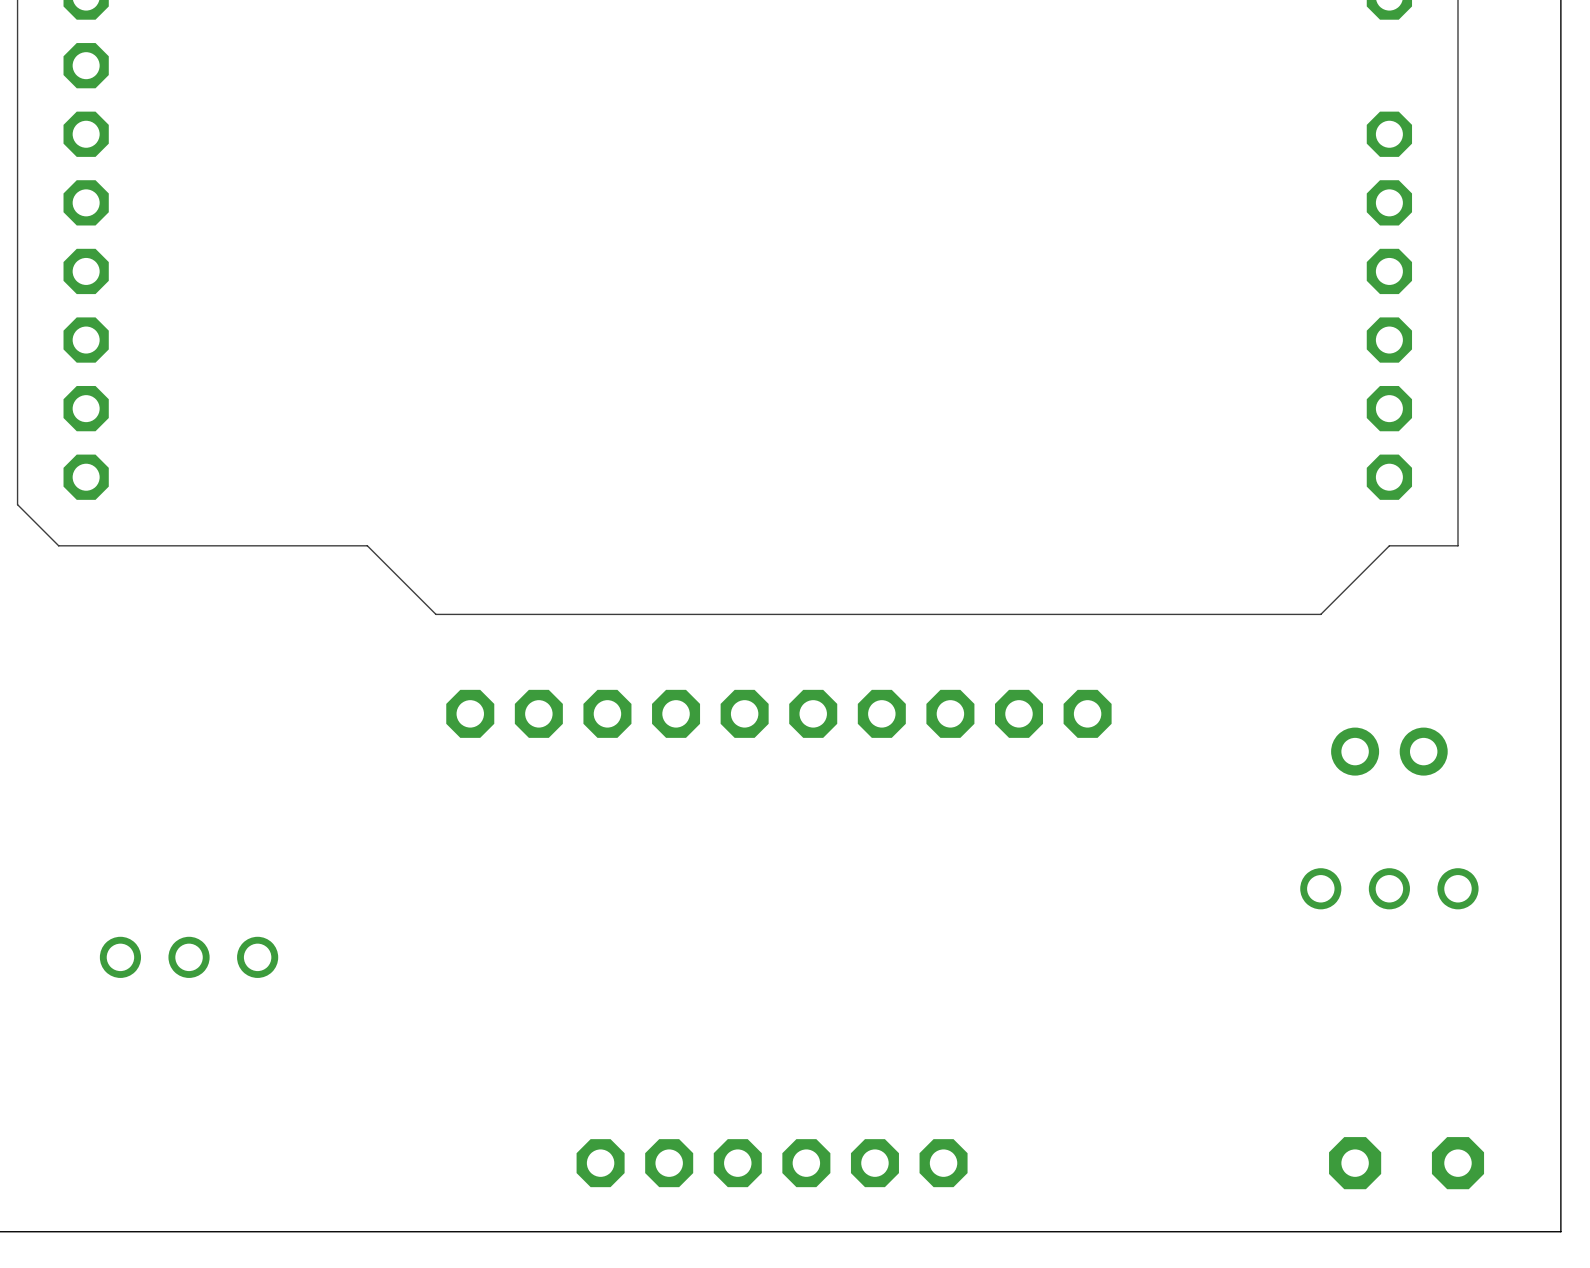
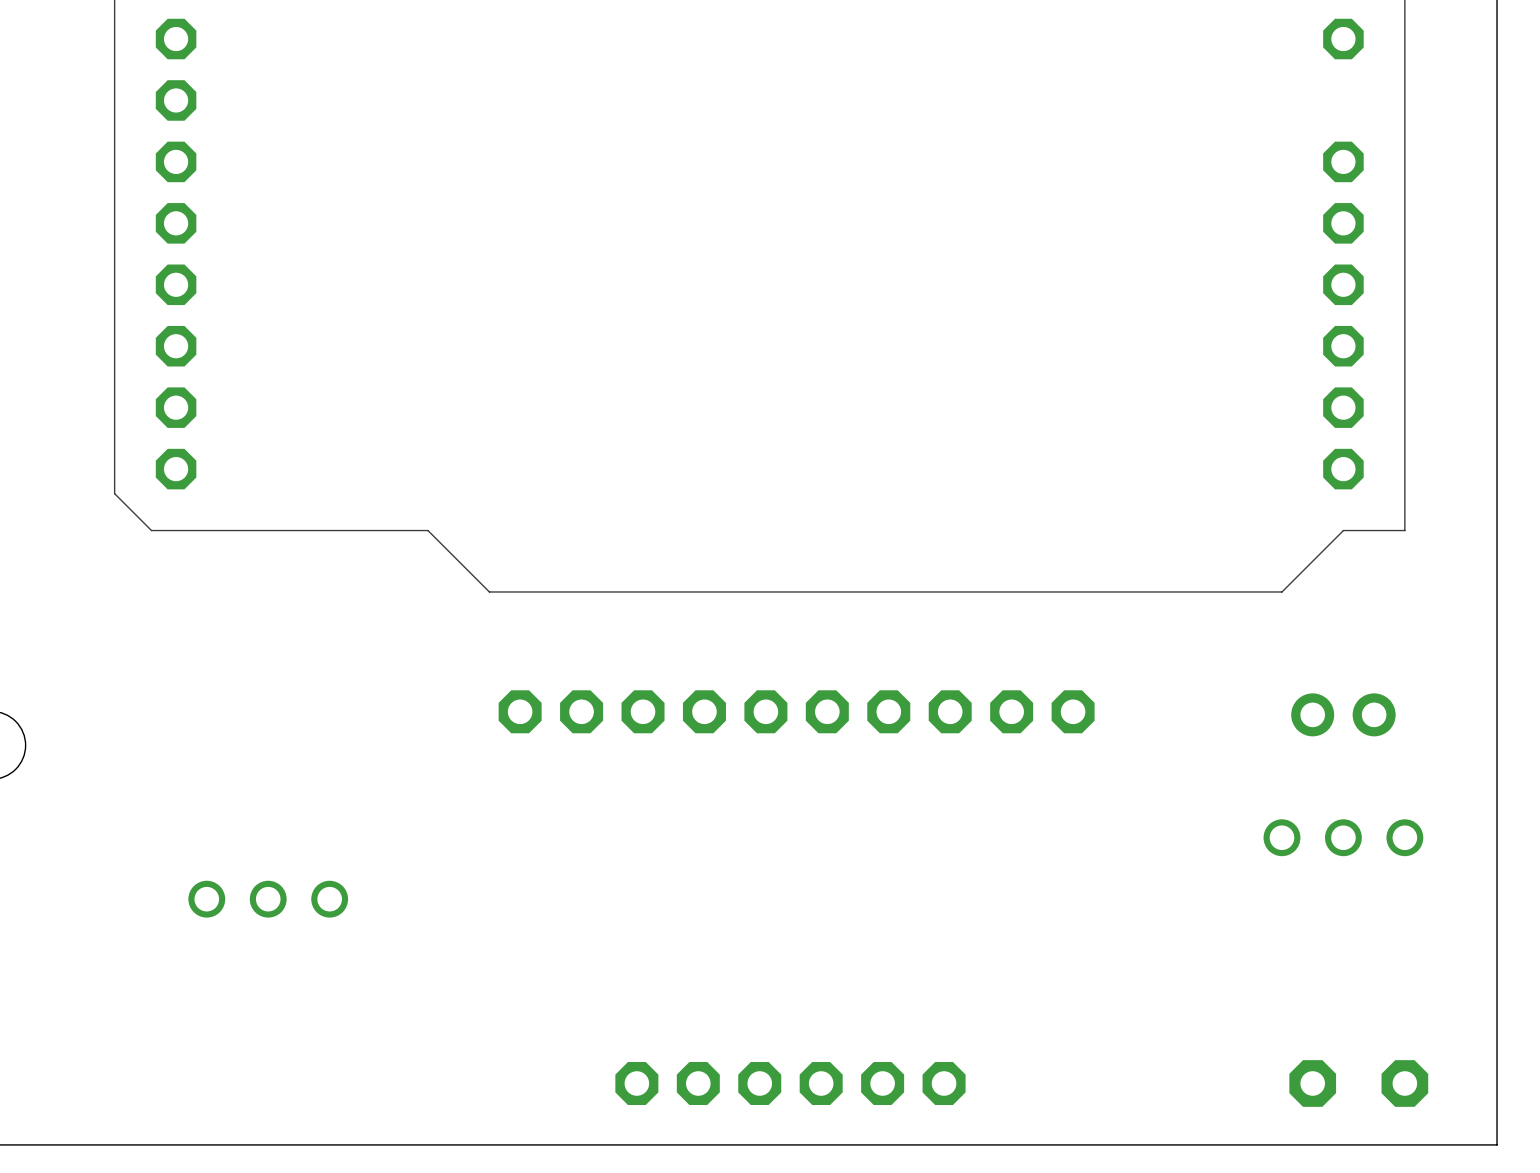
part position: (778, 713) -> (796, 711)

